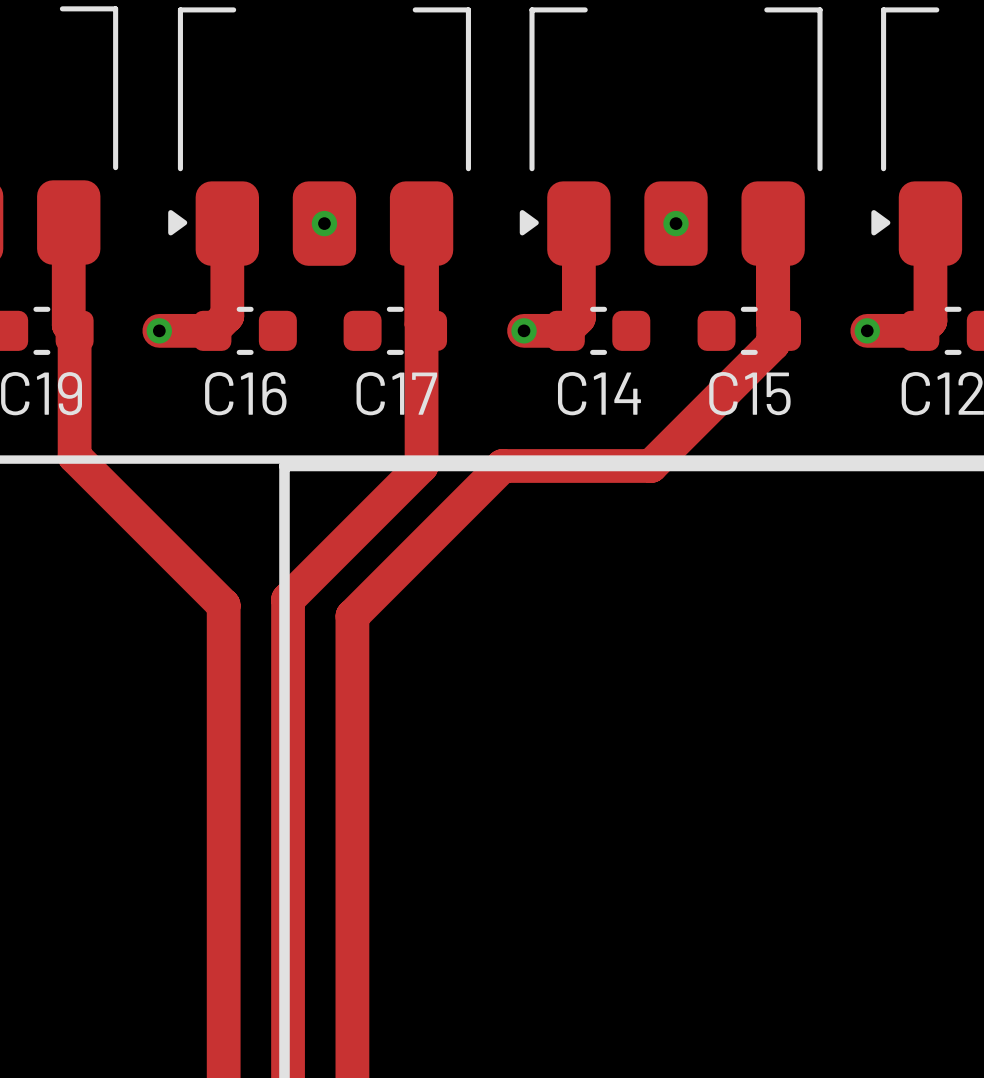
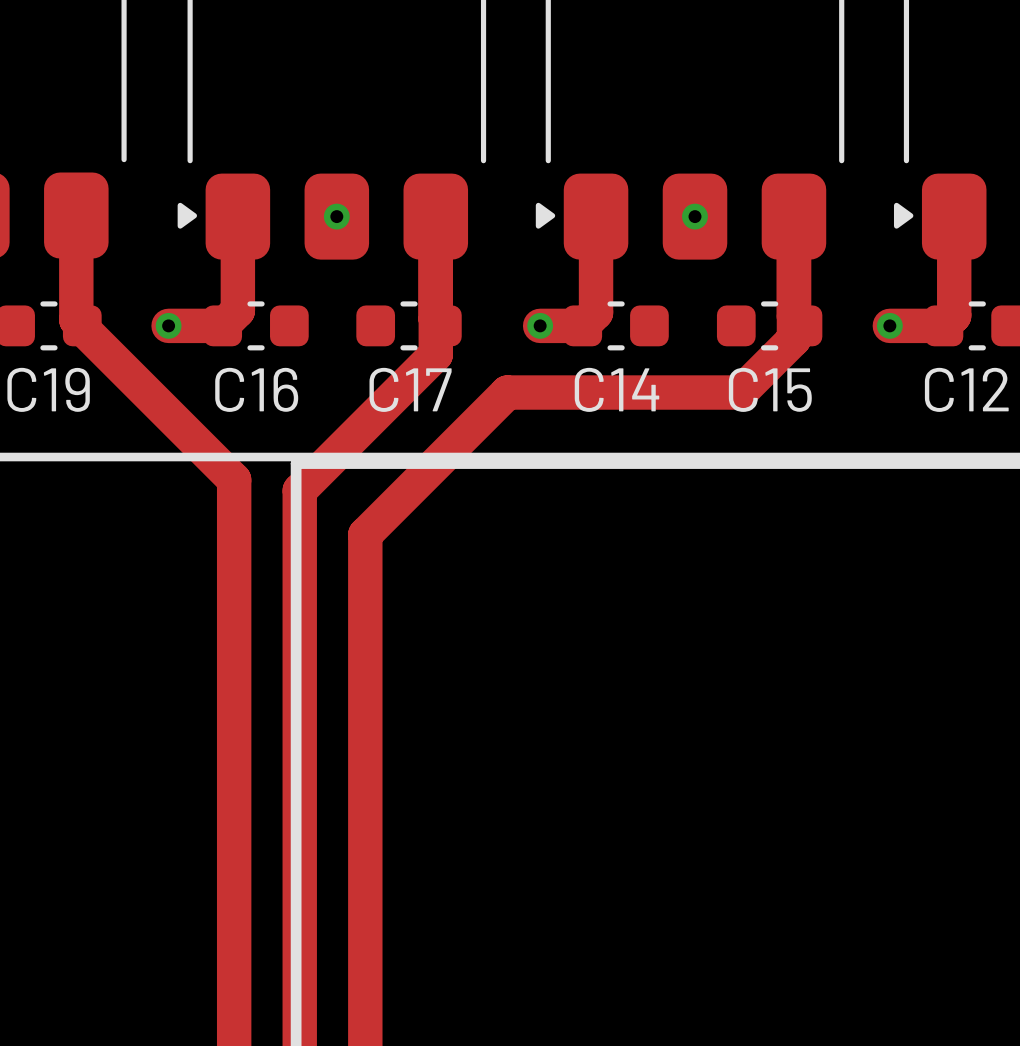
track: (74, 333) (74, 456) (223, 605) -> (82, 328) (234, 479) (234, 605)
track: (421, 359) (421, 465) (288, 599) -> (435, 354) (299, 490) (299, 599)
track: (720, 396) (651, 465) (502, 465) (352, 616) -> (740, 392) (507, 392) (365, 534) (365, 616)

